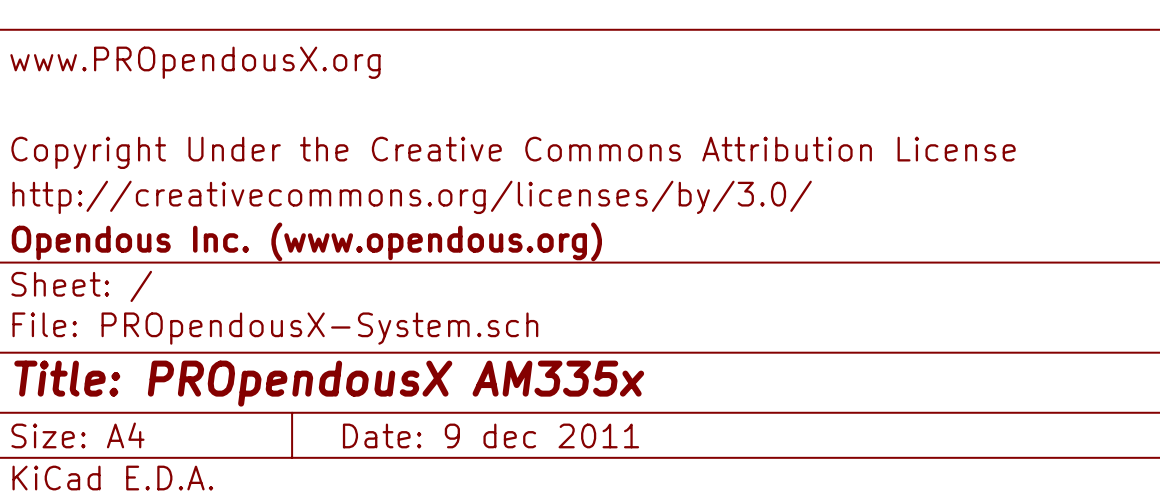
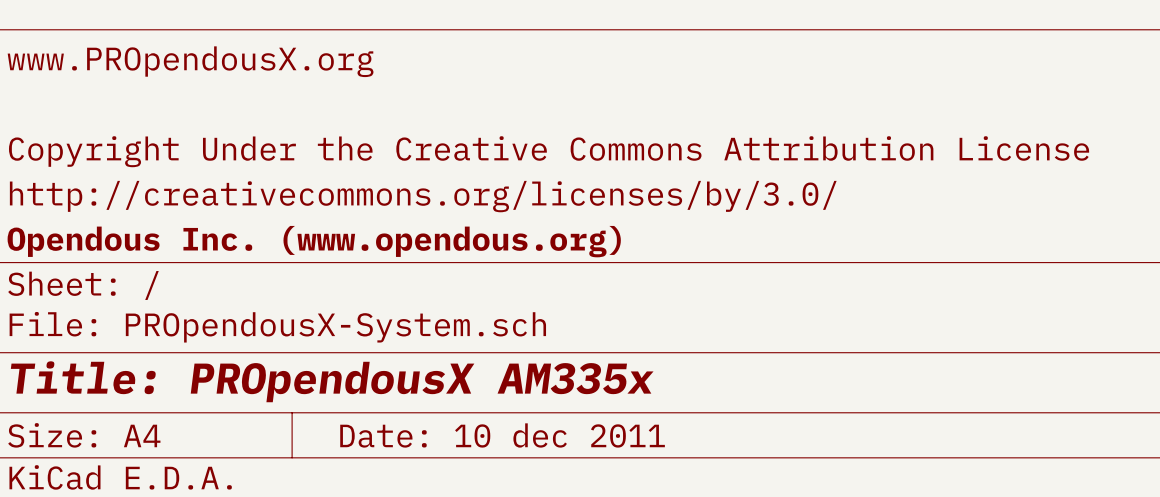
title block: Date: 9 dec 2011 (491, 435) -> Date: 10 dec 2011 (502, 435)

